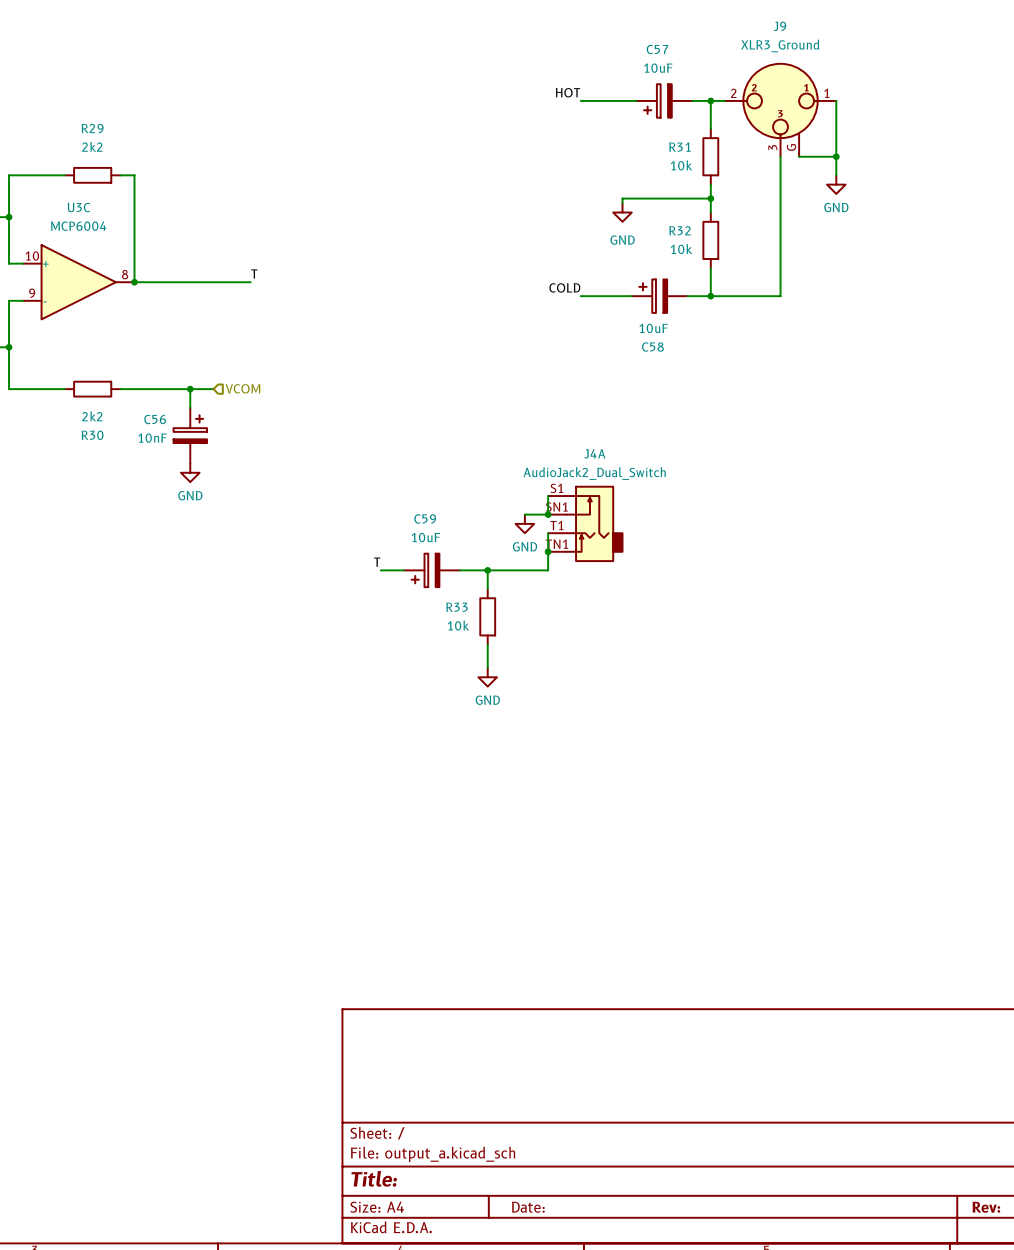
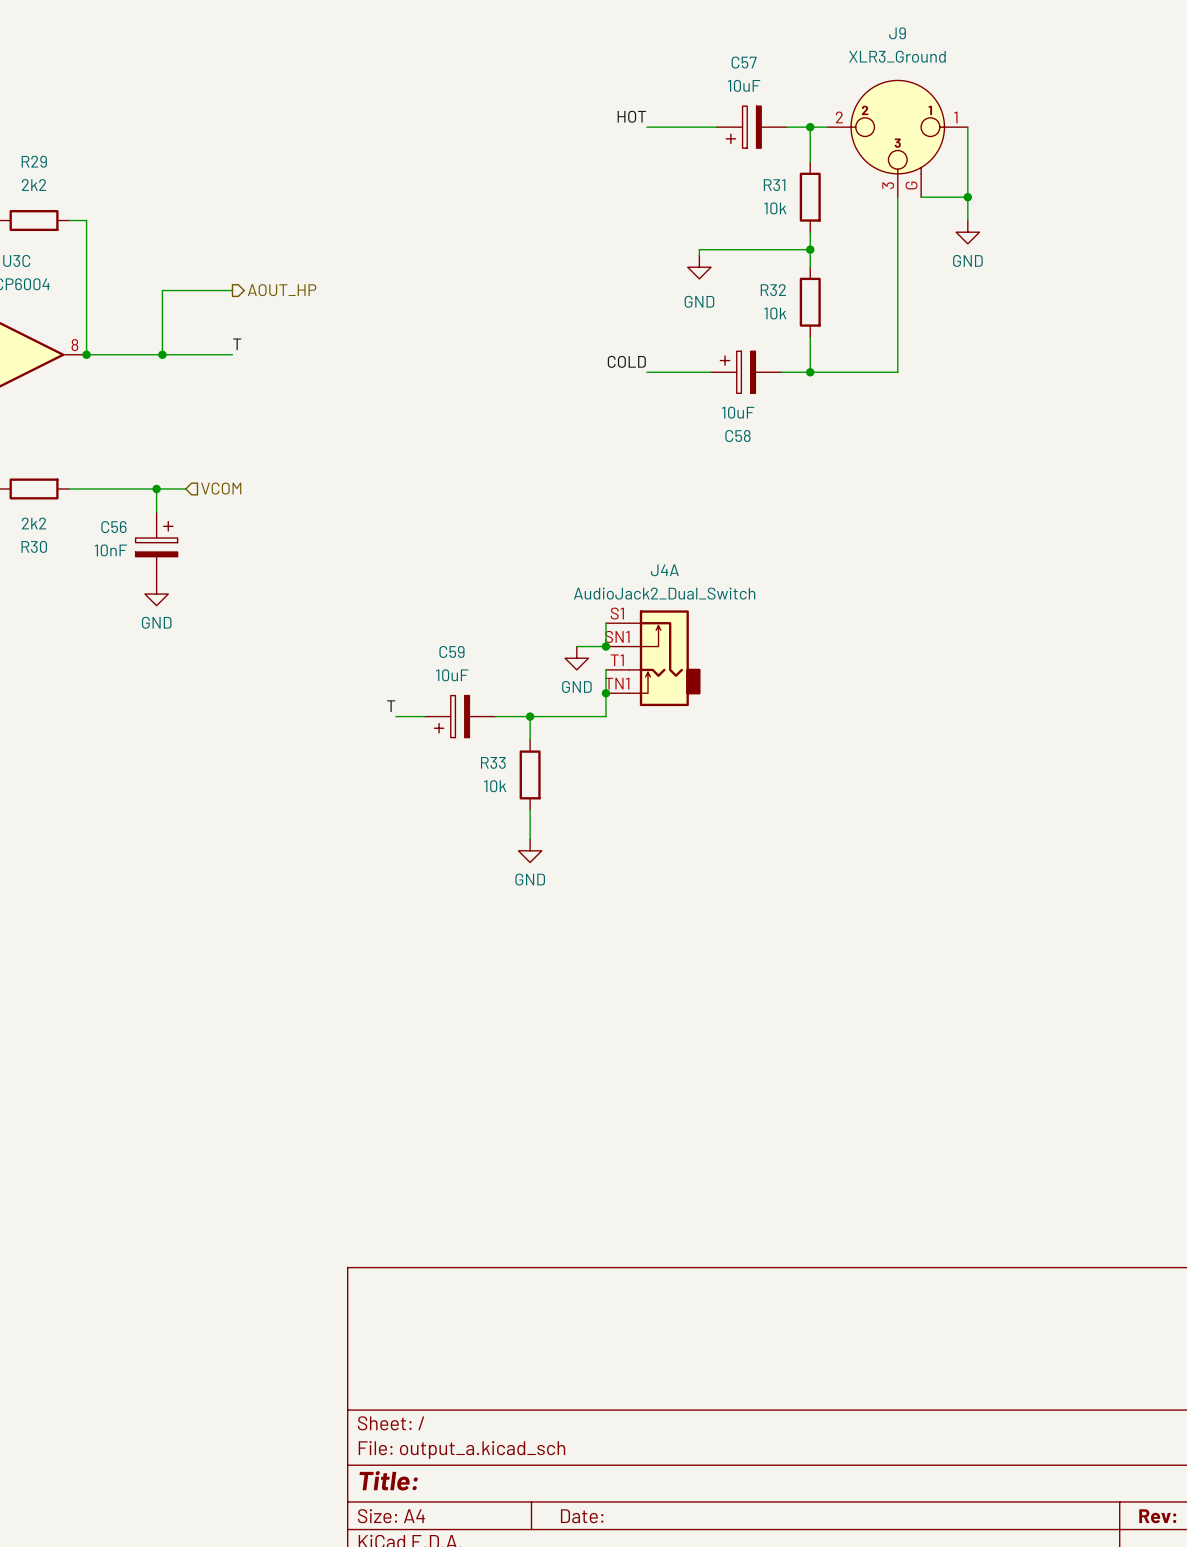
wire: none -> (232, 290) (162, 290) (162, 354)
hierarchical label: none -> AOUT_HP (282, 290)
junction: none -> (162, 354)

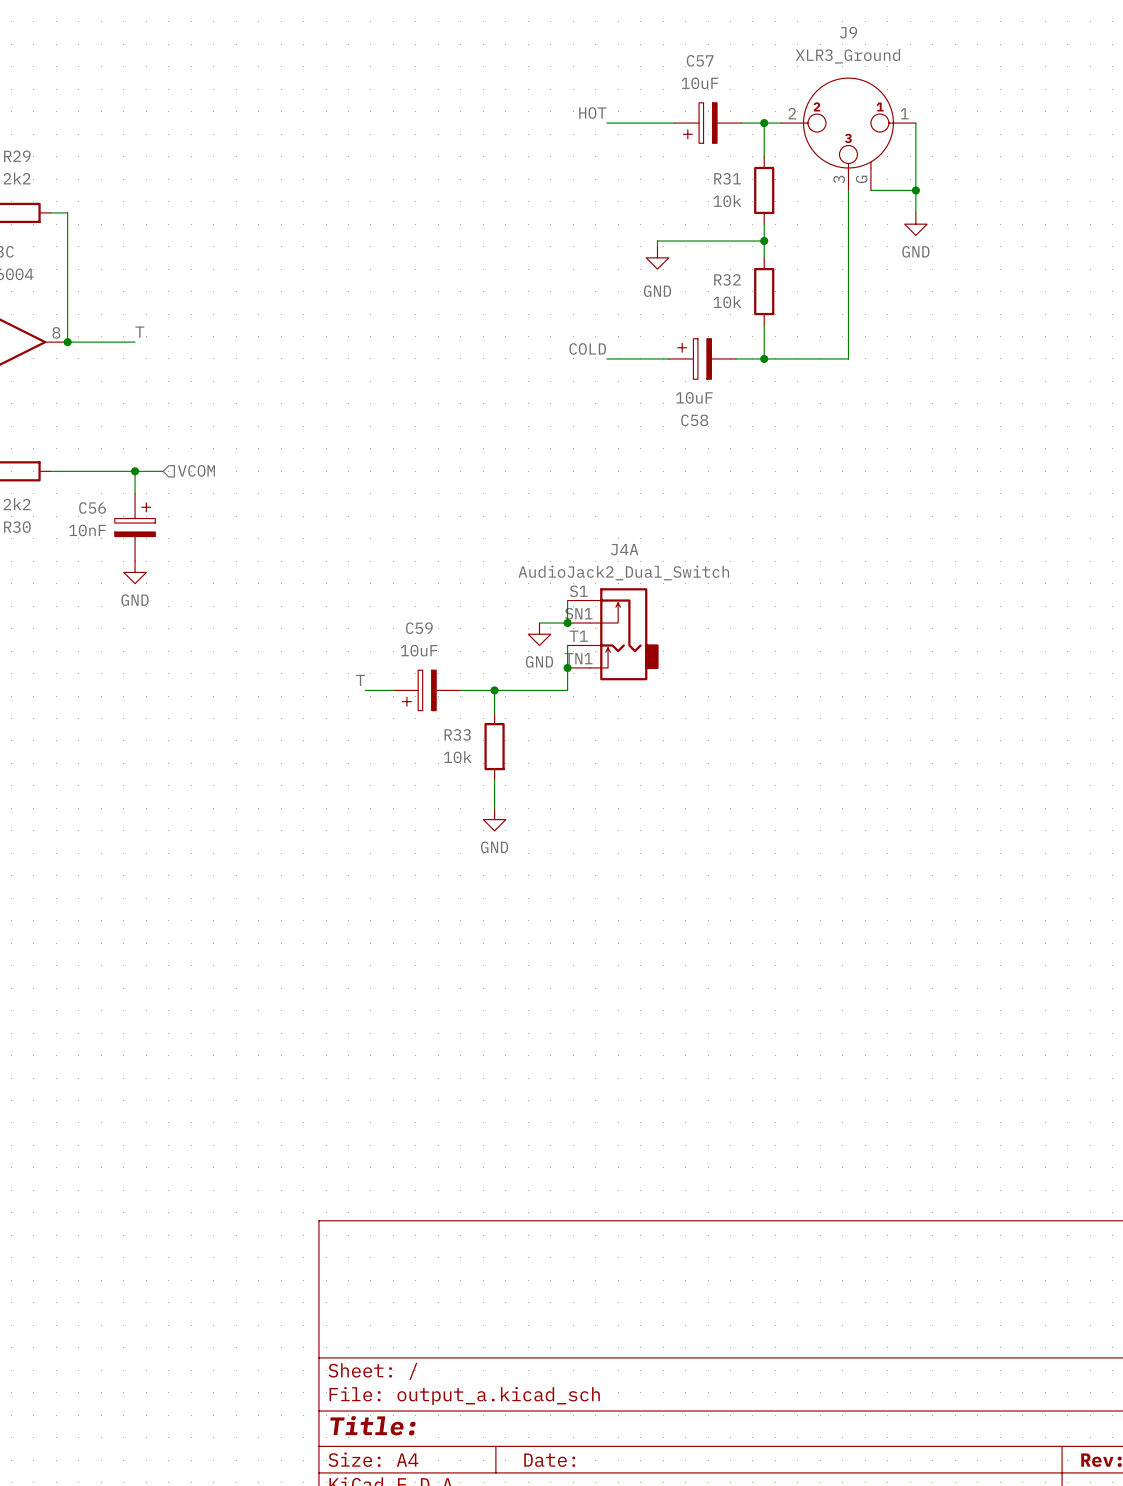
wire: (232, 290) (162, 290) (162, 354) -> none
hierarchical label: AOUT_HP (282, 290) -> none
label position: T (237, 344) -> T (139, 332)
wire: (156, 354) (232, 354) -> none
junction: (162, 354) -> none

